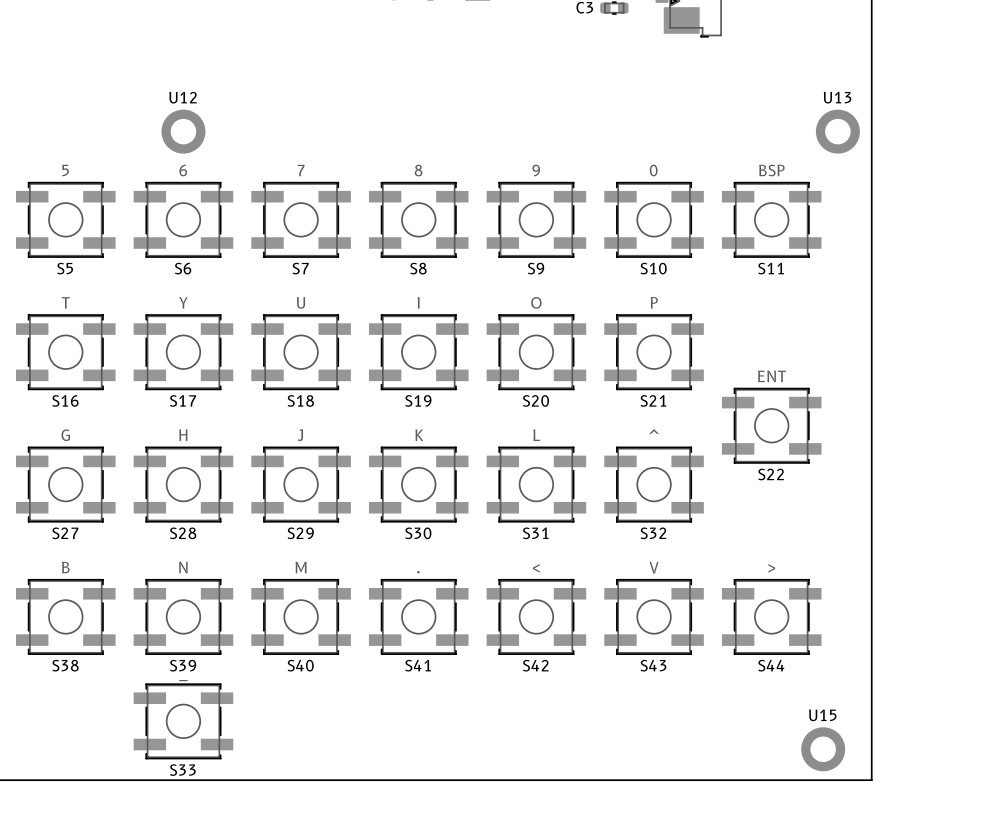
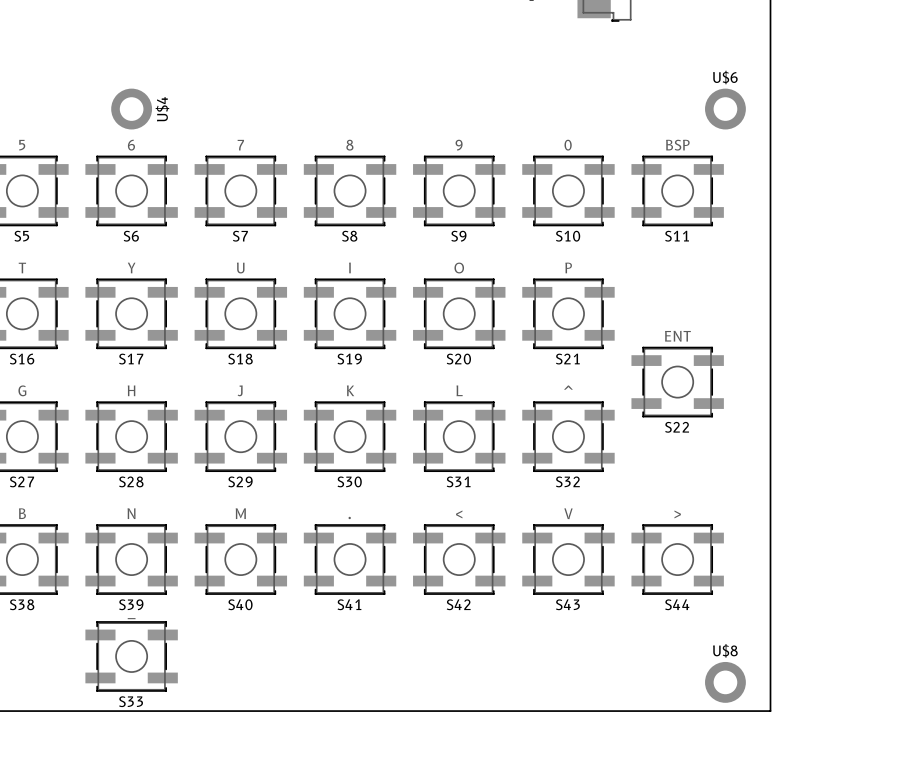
U12 name: U12 (183, 97) -> U$4 (162, 109)
U$6: none -> (725, 109)
U13: (837, 131) -> none
U15 name: U15 (822, 715) -> U$8 (725, 650)

